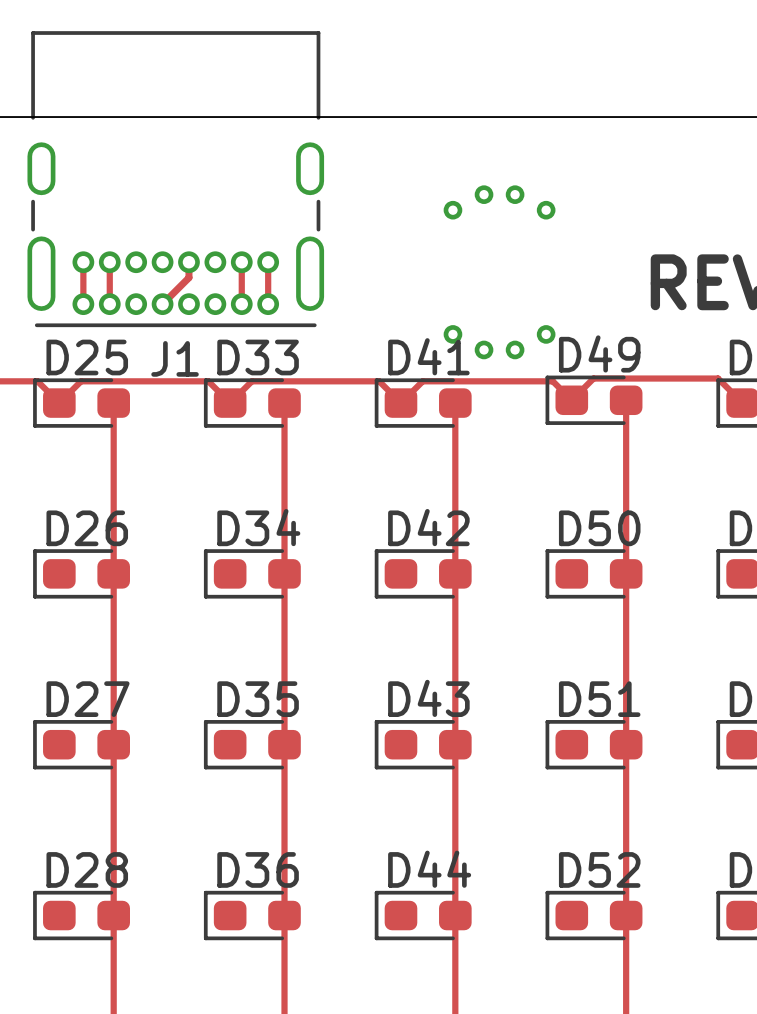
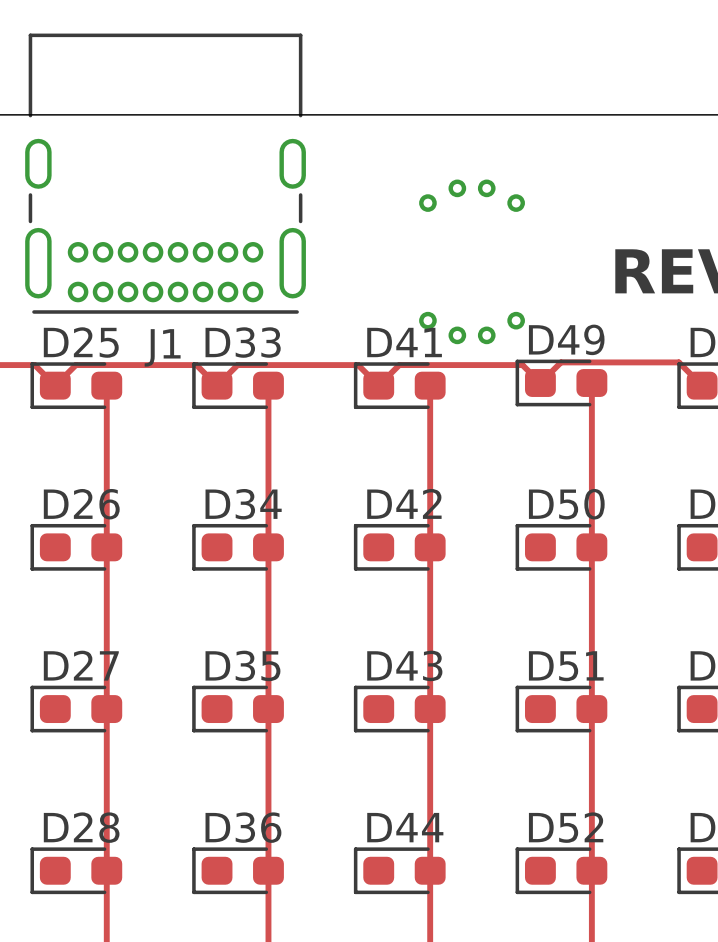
track: (83, 262) (83, 304) -> none
track: (109, 262) (109, 304) -> none
track: (188, 262) (188, 277) (162, 304) -> none
track: (241, 262) (241, 304) -> none
track: (268, 262) (268, 304) -> none

